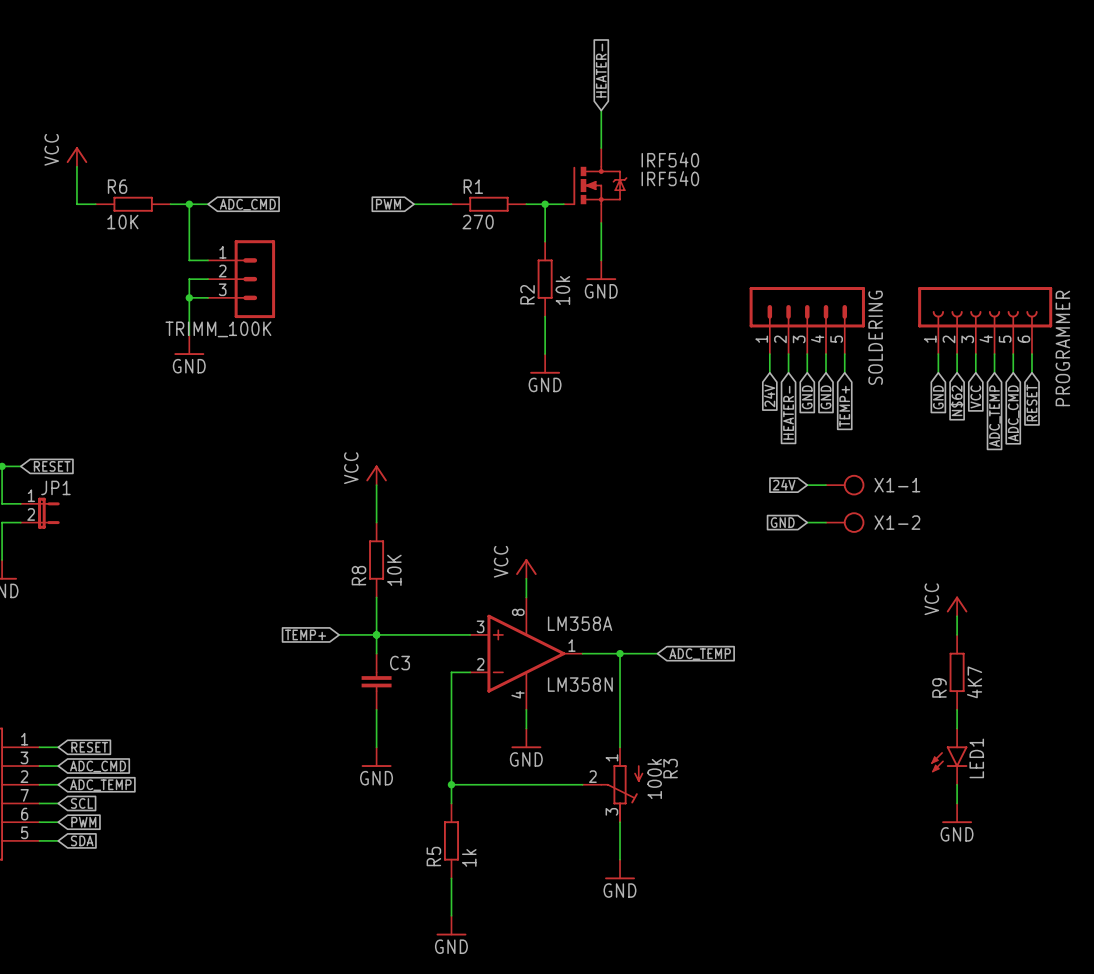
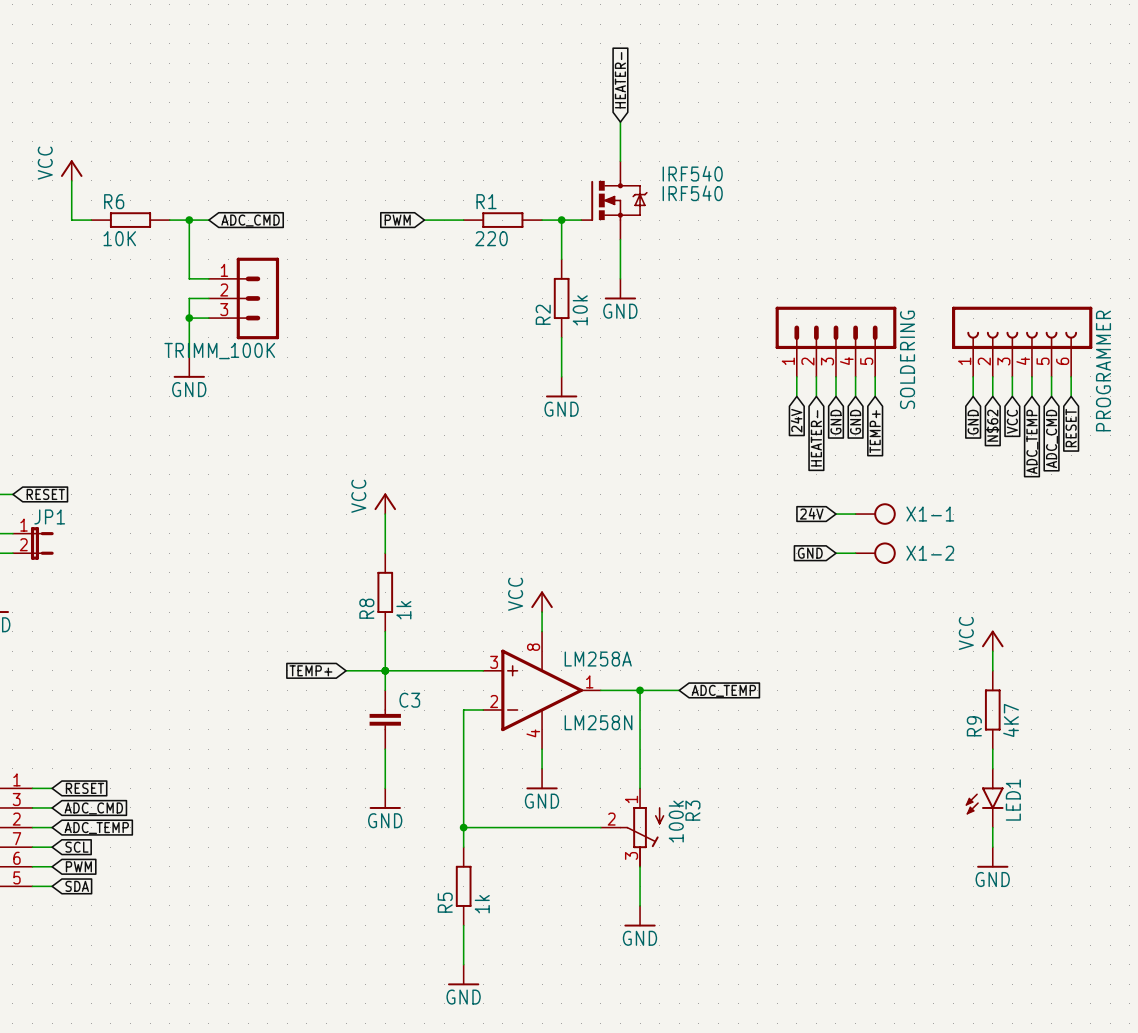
R1 value: 270 (478, 222) -> 220 (491, 238)
R8 value: 10K (394, 570) -> 1k (403, 610)
LM358A name: LM358A (580, 623) -> LM258A (598, 659)
LM358A value: LM358N (580, 684) -> LM258N (598, 722)

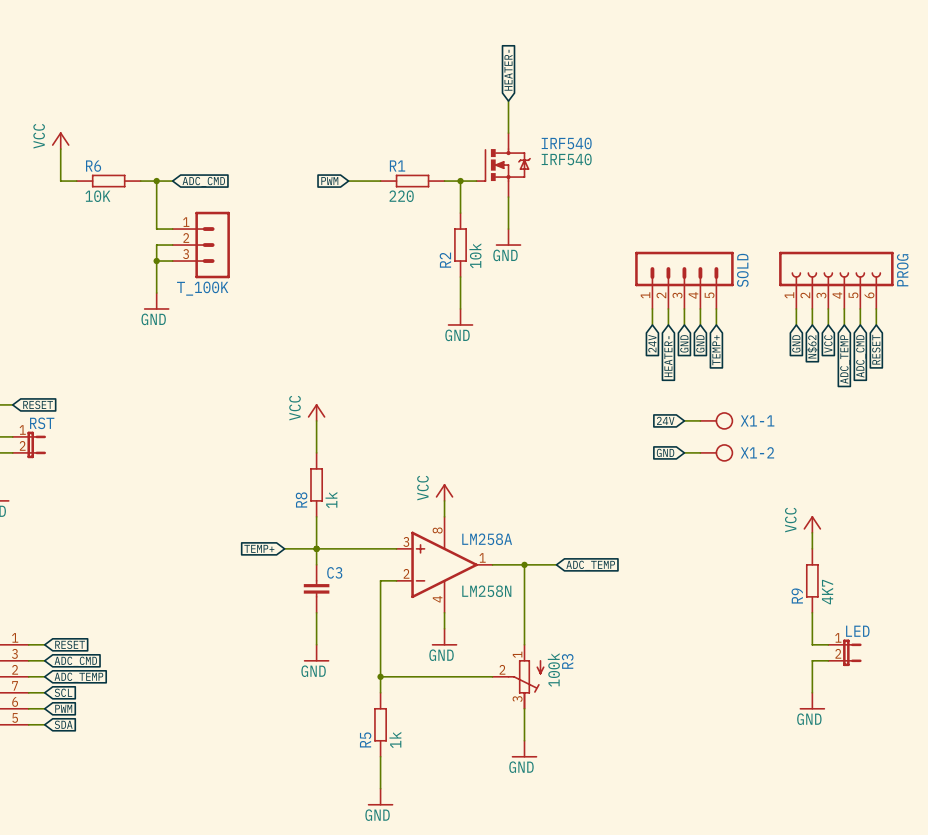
TRIMM_100K name: TRIMM_100K (219, 351) -> T_100K (202, 288)
SOLDERING name: SOLDERING (907, 359) -> SOLD (742, 270)
PROGRAMMER name: PROGRAMMER (1103, 371) -> PROG (902, 270)
JP1 name: JP1 (49, 516) -> RST (42, 423)
LED1: (984, 798) -> none
LED: none -> (844, 652)

